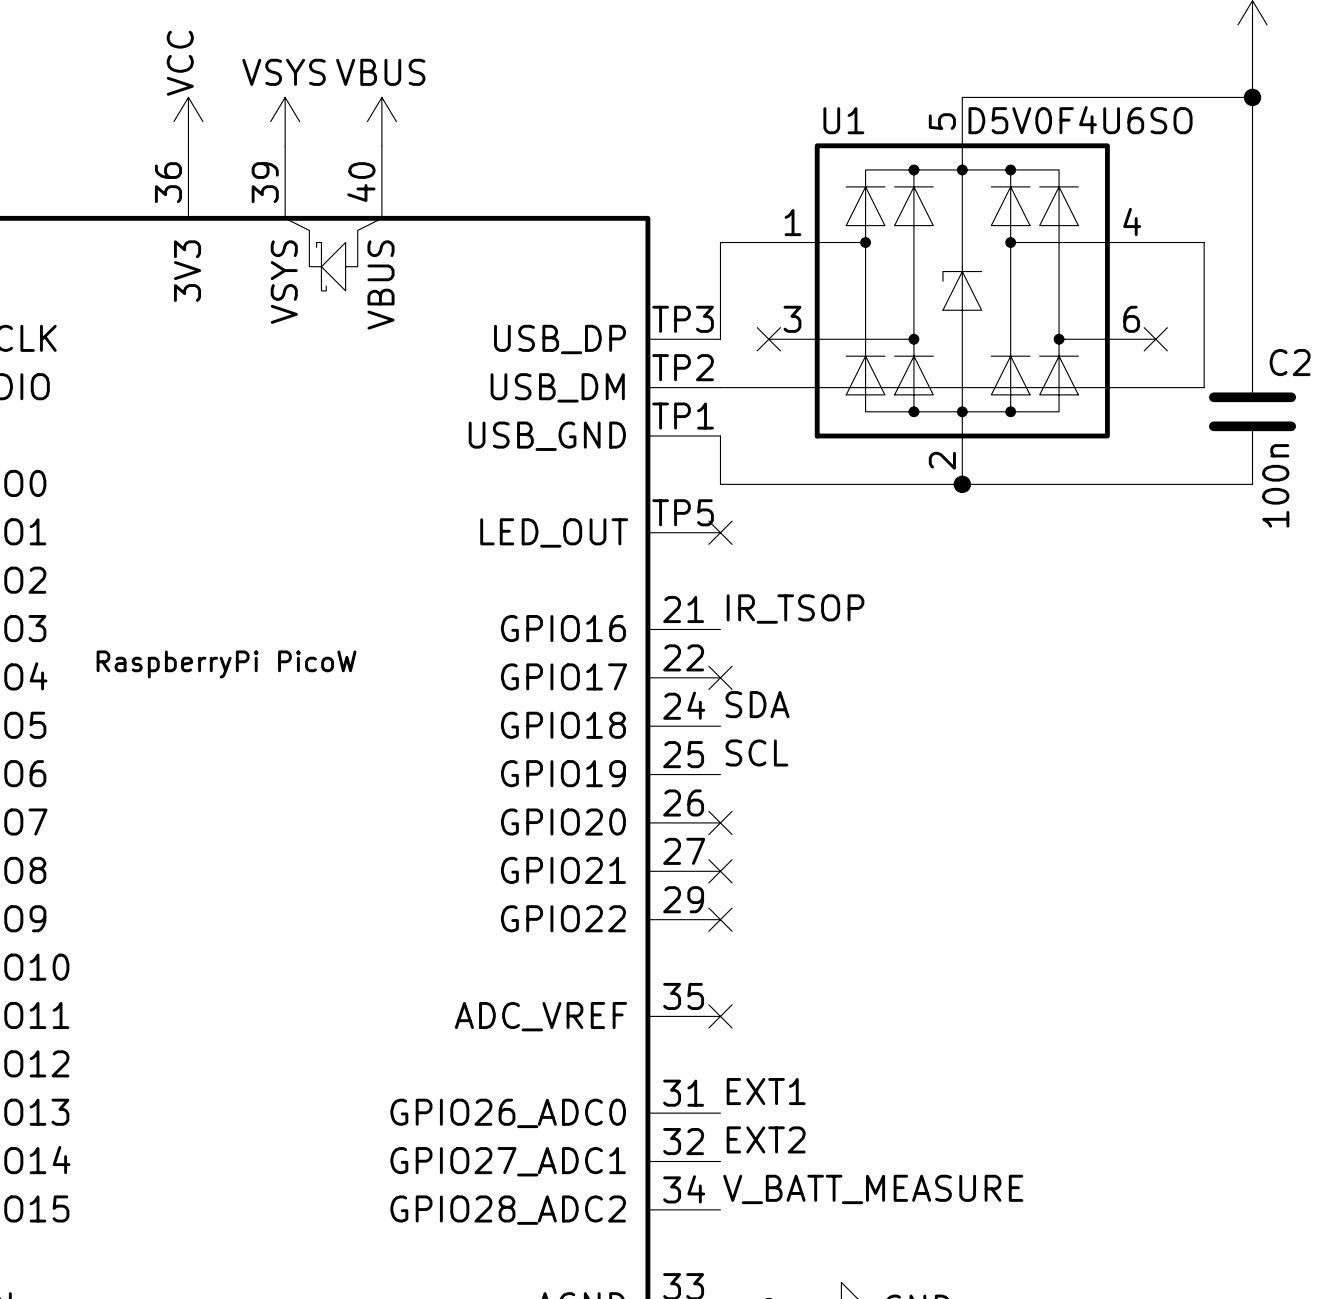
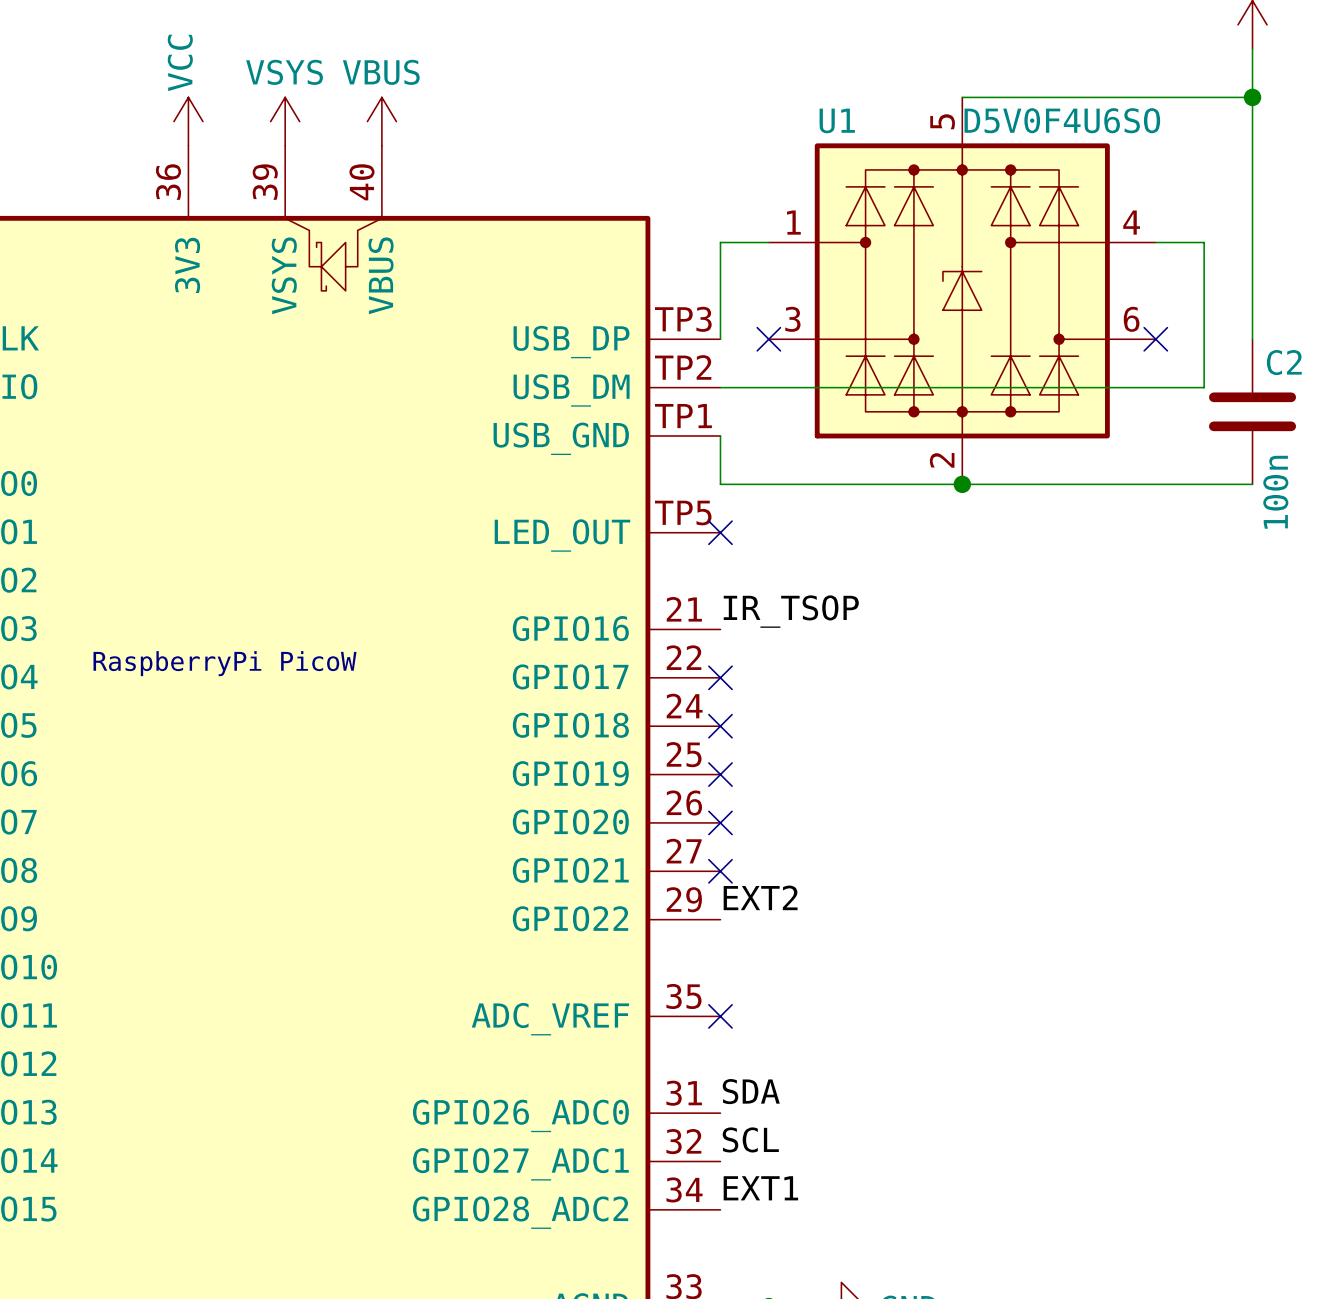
label: SDA (757, 704) -> none
no-connect mark: none -> (720, 726)
label: SCL (756, 752) -> none
no-connect mark: none -> (720, 774)
label: none -> EXT2 (760, 897)
no-connect mark: (720, 919) -> none
label: EXT1 (766, 1091) -> SDA (751, 1091)
label: EXT2 (766, 1139) -> SCL (750, 1139)
label: V_BATT_MEASURE (873, 1189) -> EXT1 (760, 1188)

